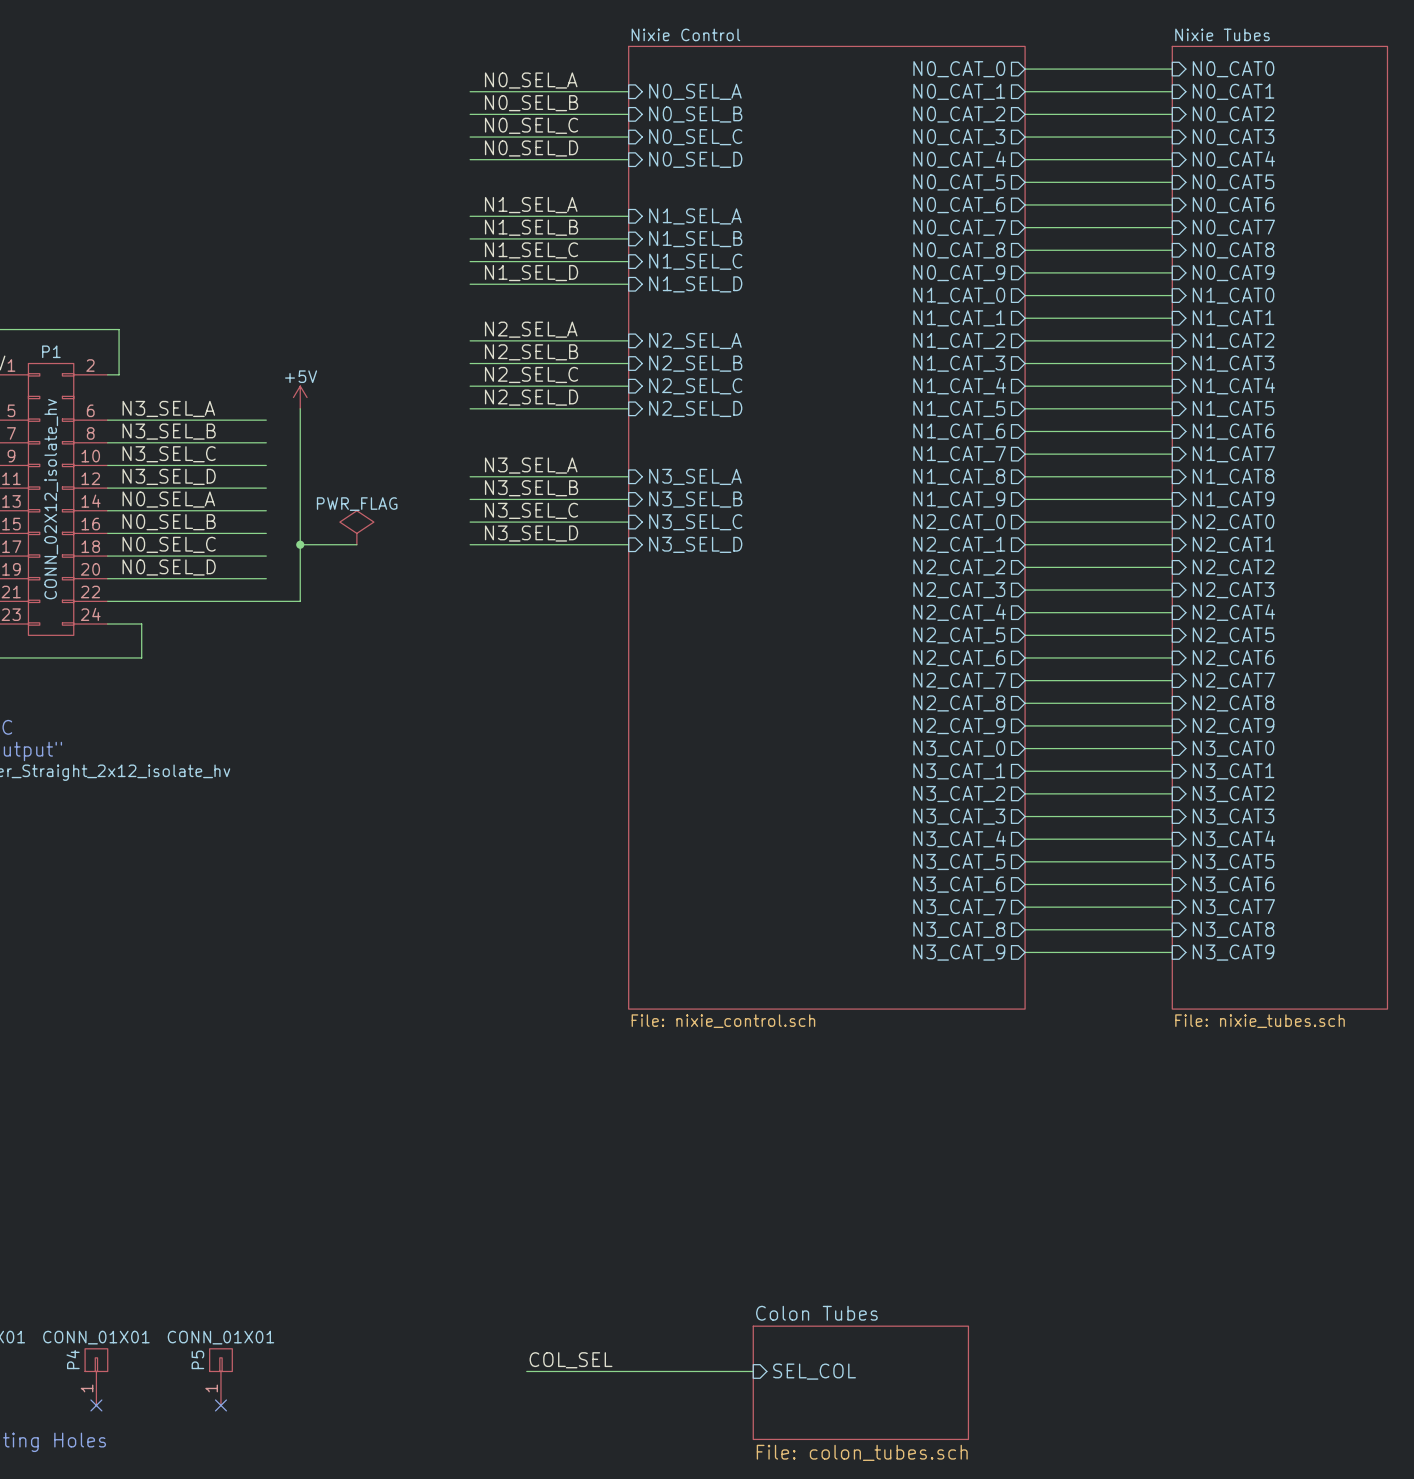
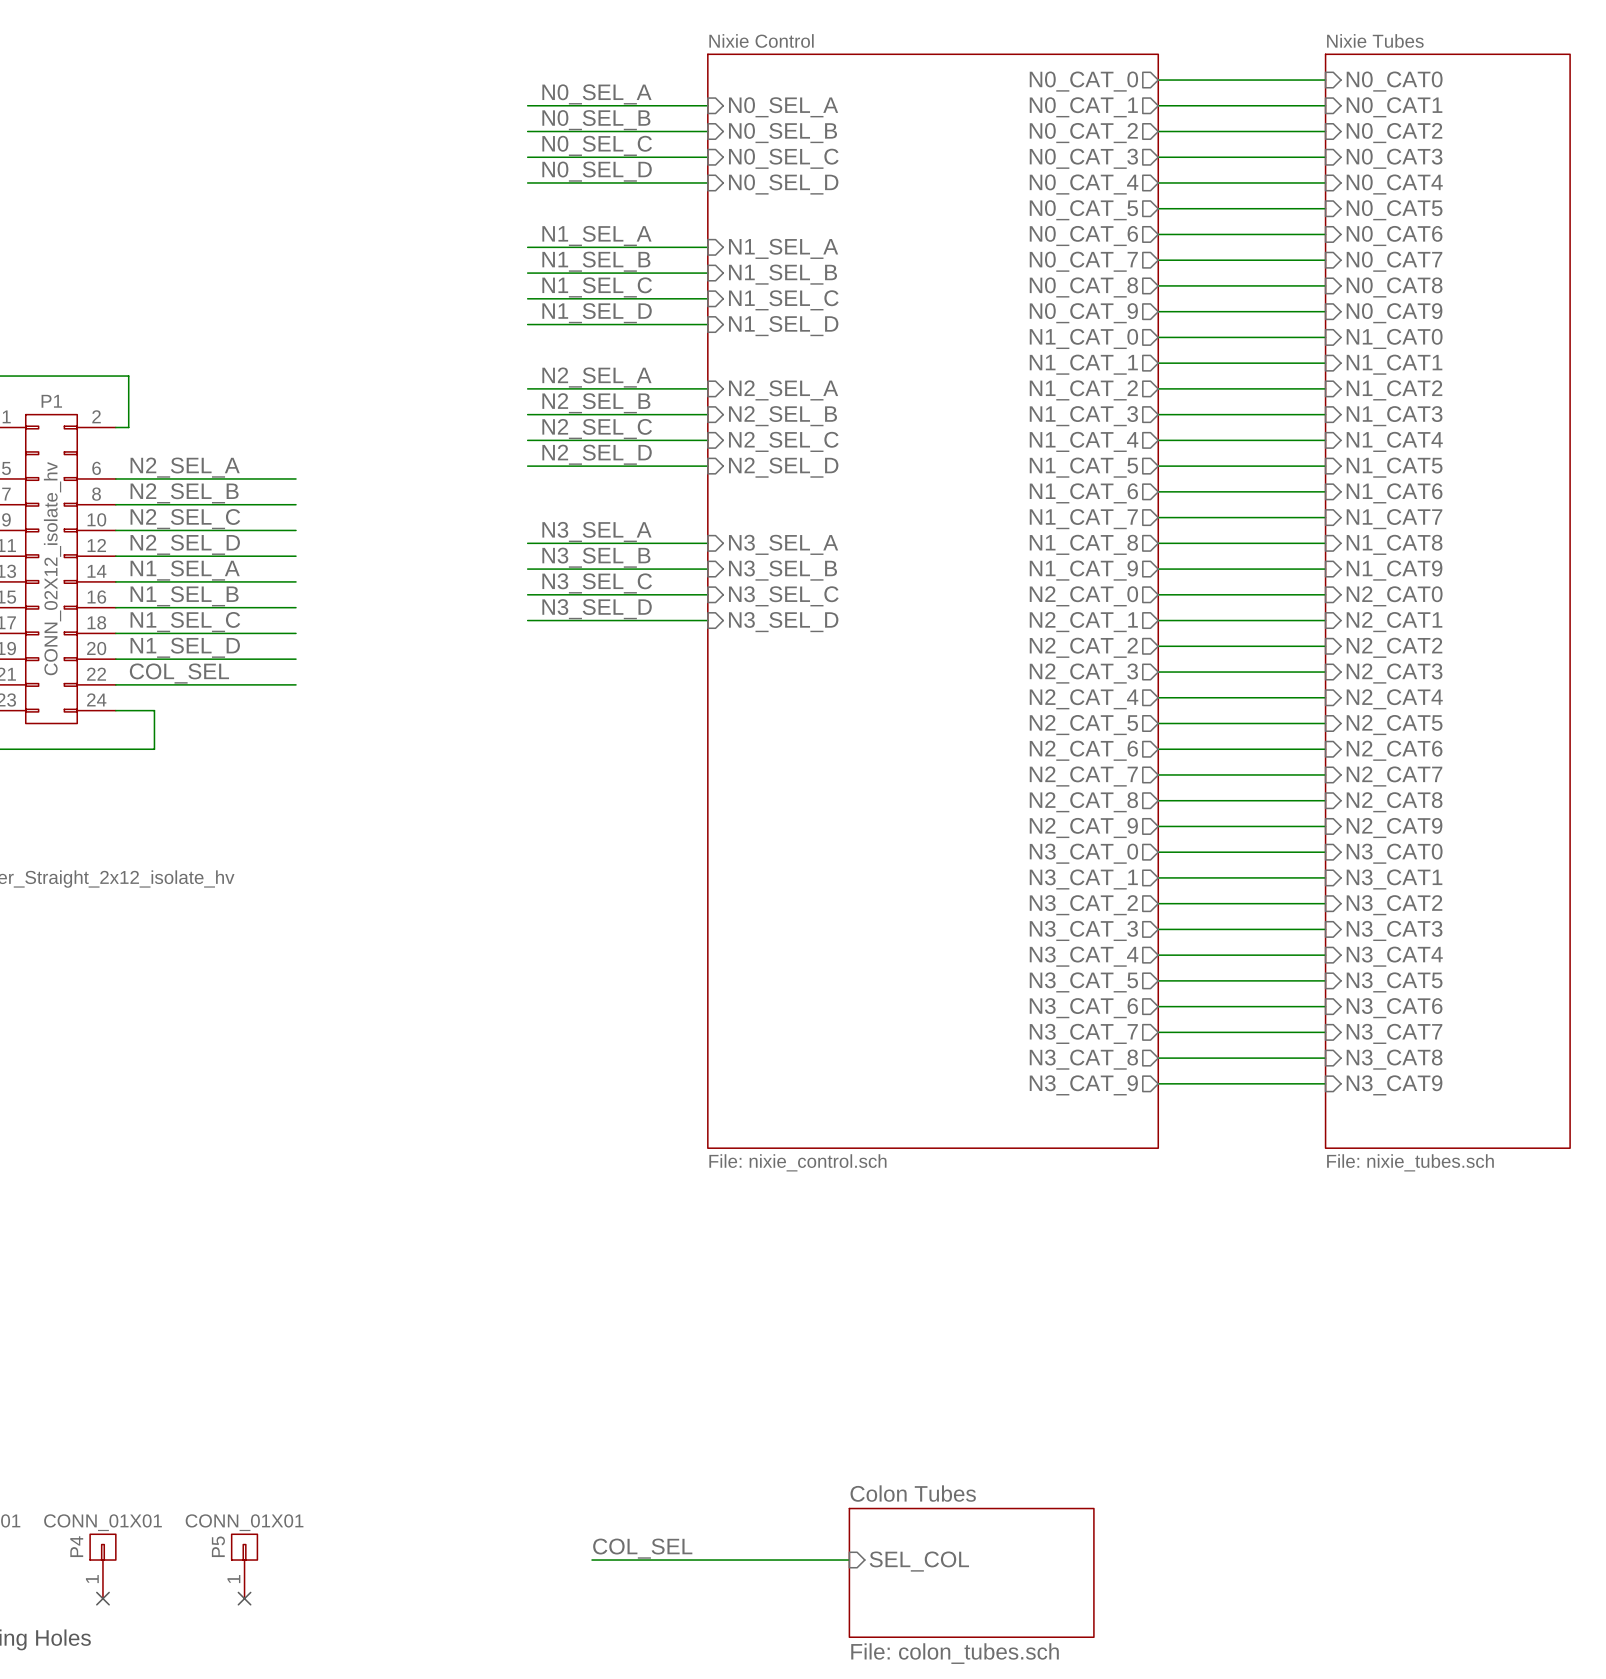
power symbol: +5V (300, 397) -> none
label: N3_SEL_A (168, 408) -> N2_SEL_A (185, 467)
wire: (300, 408) (300, 601) (266, 601) -> none
label: N3_SEL_B (169, 431) -> N2_SEL_B (184, 493)
label: N3_SEL_C (169, 454) -> N2_SEL_C (185, 519)
label: N3_SEL_D (169, 476) -> N2_SEL_D (185, 544)
label: N0_SEL_A (168, 499) -> N1_SEL_A (185, 570)
label: N0_SEL_B (169, 522) -> N1_SEL_B (184, 596)
power symbol: PWR_FLAG (356, 527) -> none
label: N0_SEL_C (169, 544) -> N1_SEL_C (185, 622)
wire: (300, 544) (356, 544) -> none
junction: (300, 544) -> none
label: N0_SEL_D (169, 567) -> N1_SEL_D (185, 647)
label: none -> COL_SEL (179, 673)

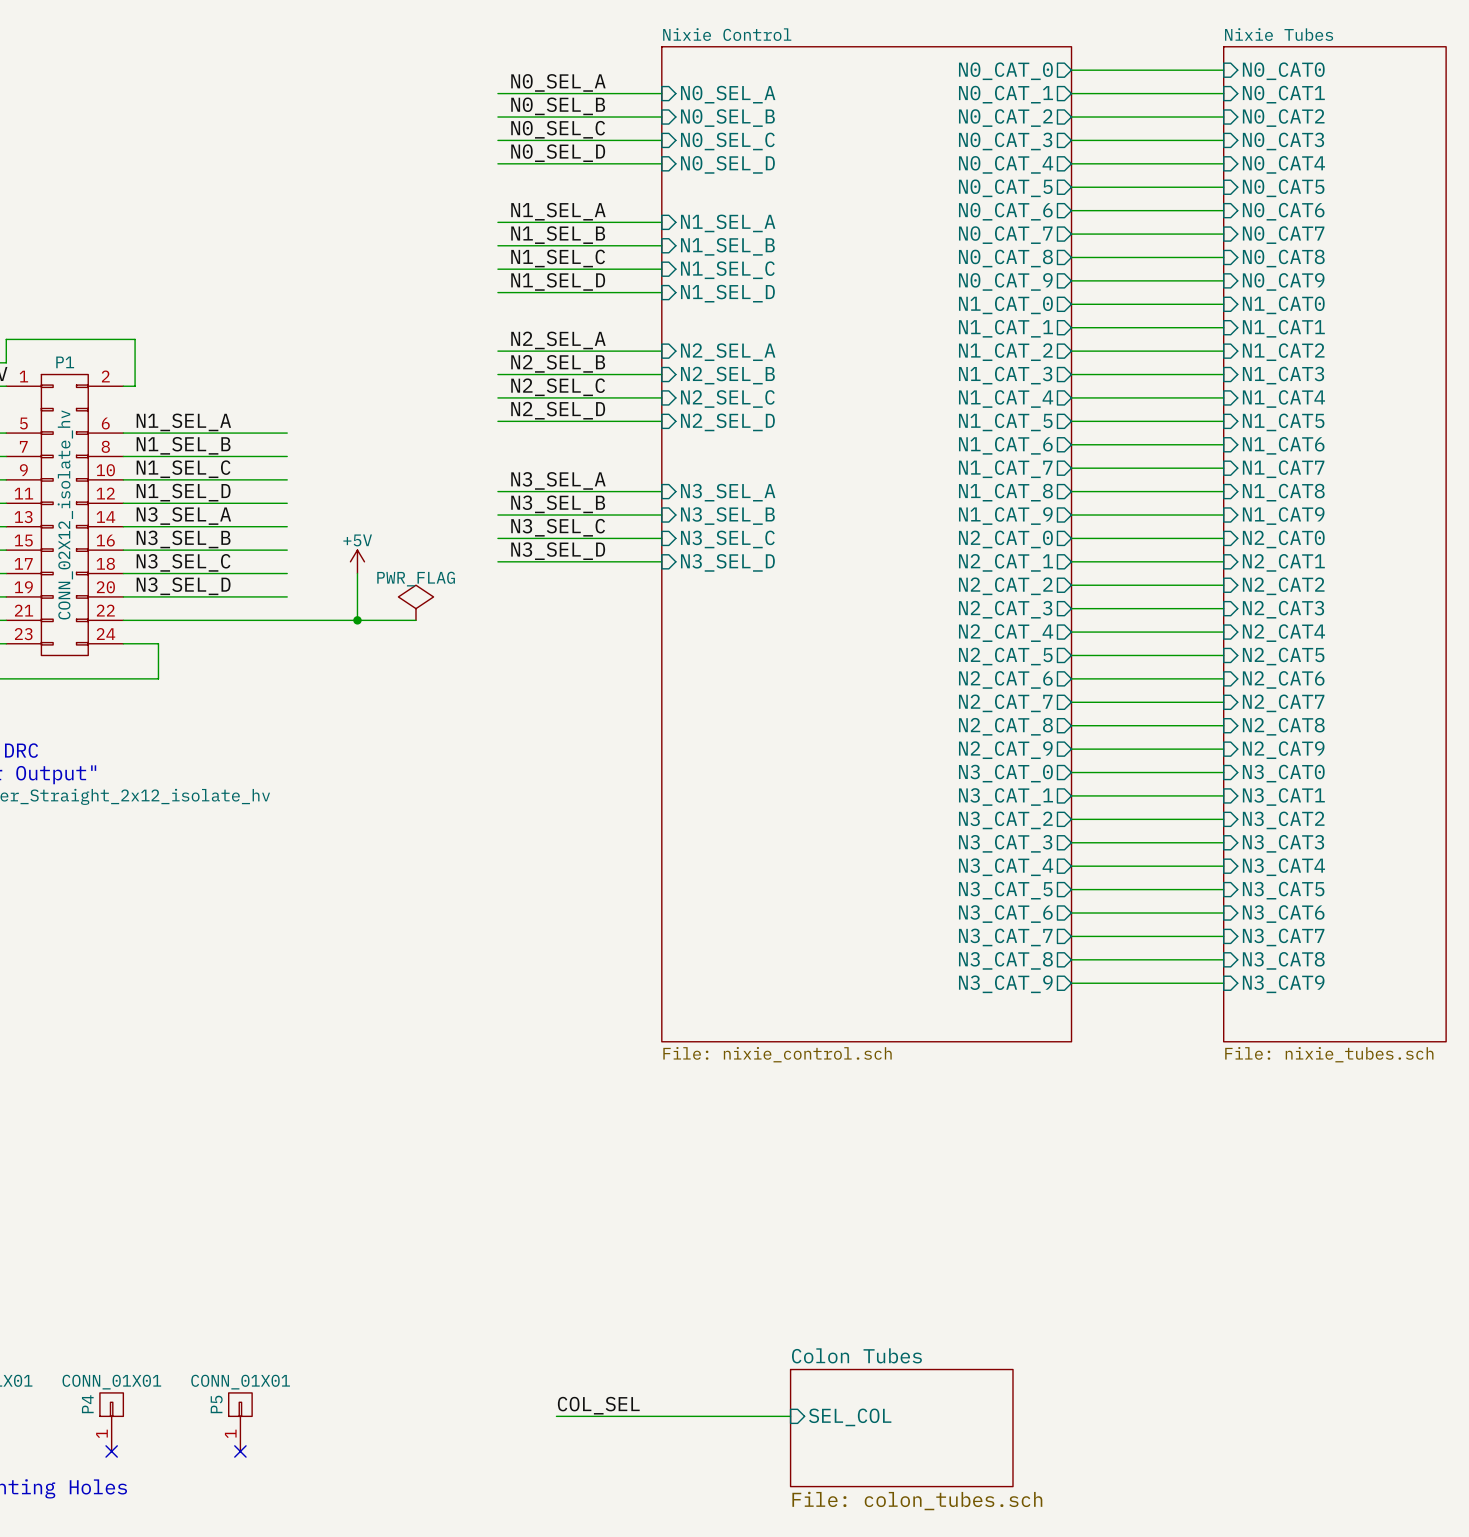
label: N2_SEL_A (185, 467) -> N1_SEL_A (183, 422)
label: N2_SEL_B (184, 493) -> N1_SEL_B (183, 445)
label: N2_SEL_C (185, 519) -> N1_SEL_C (183, 469)
label: N2_SEL_D (185, 544) -> N1_SEL_D (183, 492)
label: N1_SEL_A (185, 570) -> N3_SEL_A (183, 516)
label: N1_SEL_B (184, 596) -> N3_SEL_B (183, 539)
power symbol: none -> +5V (357, 561)
label: N1_SEL_C (185, 622) -> N3_SEL_C (183, 562)
wire: none -> (357, 573) (357, 620)
label: N1_SEL_D (185, 647) -> N3_SEL_D (183, 586)
power symbol: none -> PWR_FLAG (415, 602)
label: COL_SEL (179, 673) -> none
wire: none -> (287, 620) (415, 620)
junction: none -> (357, 620)

